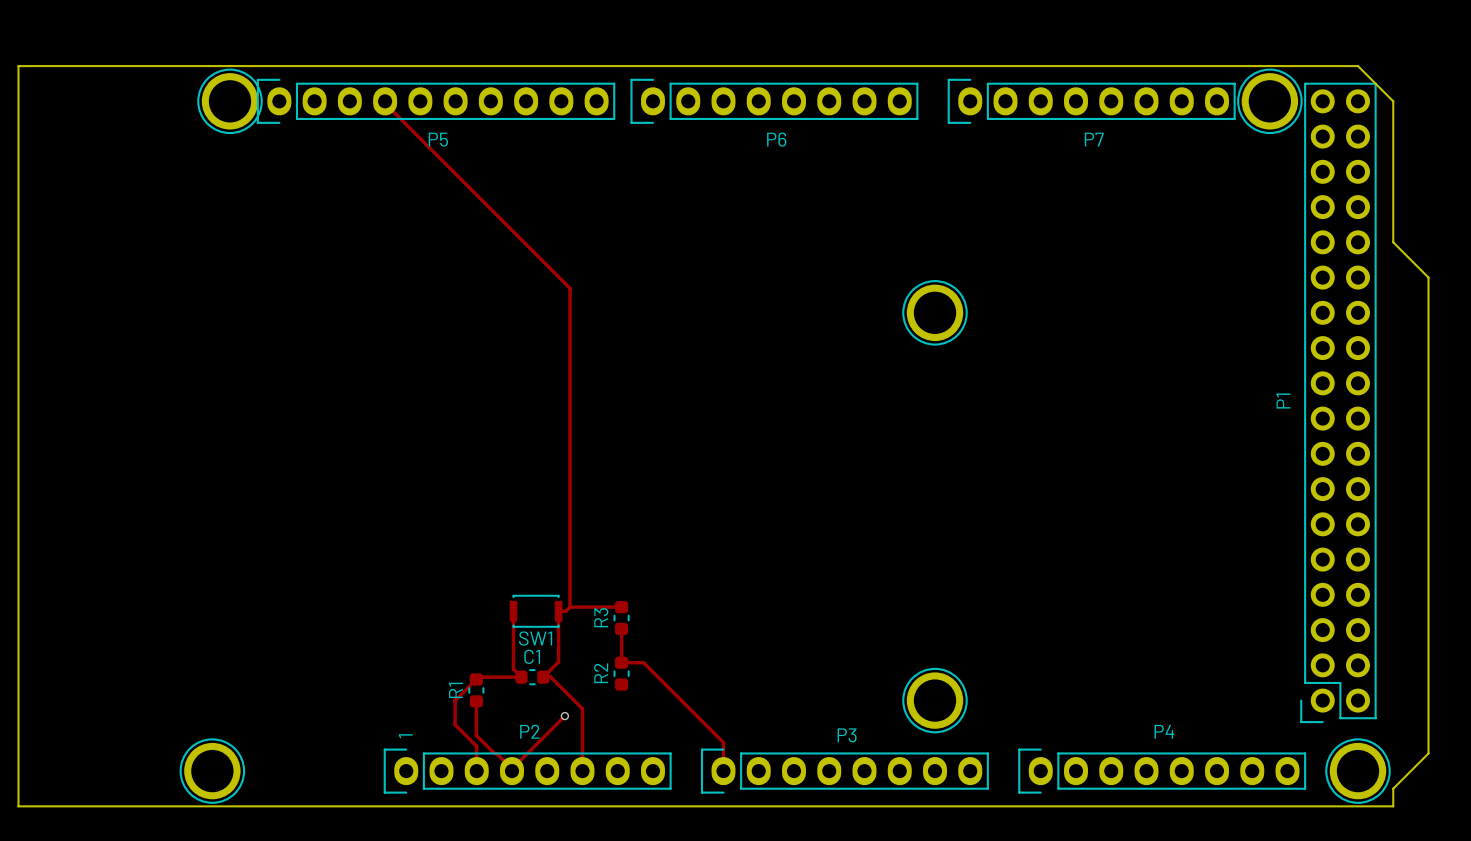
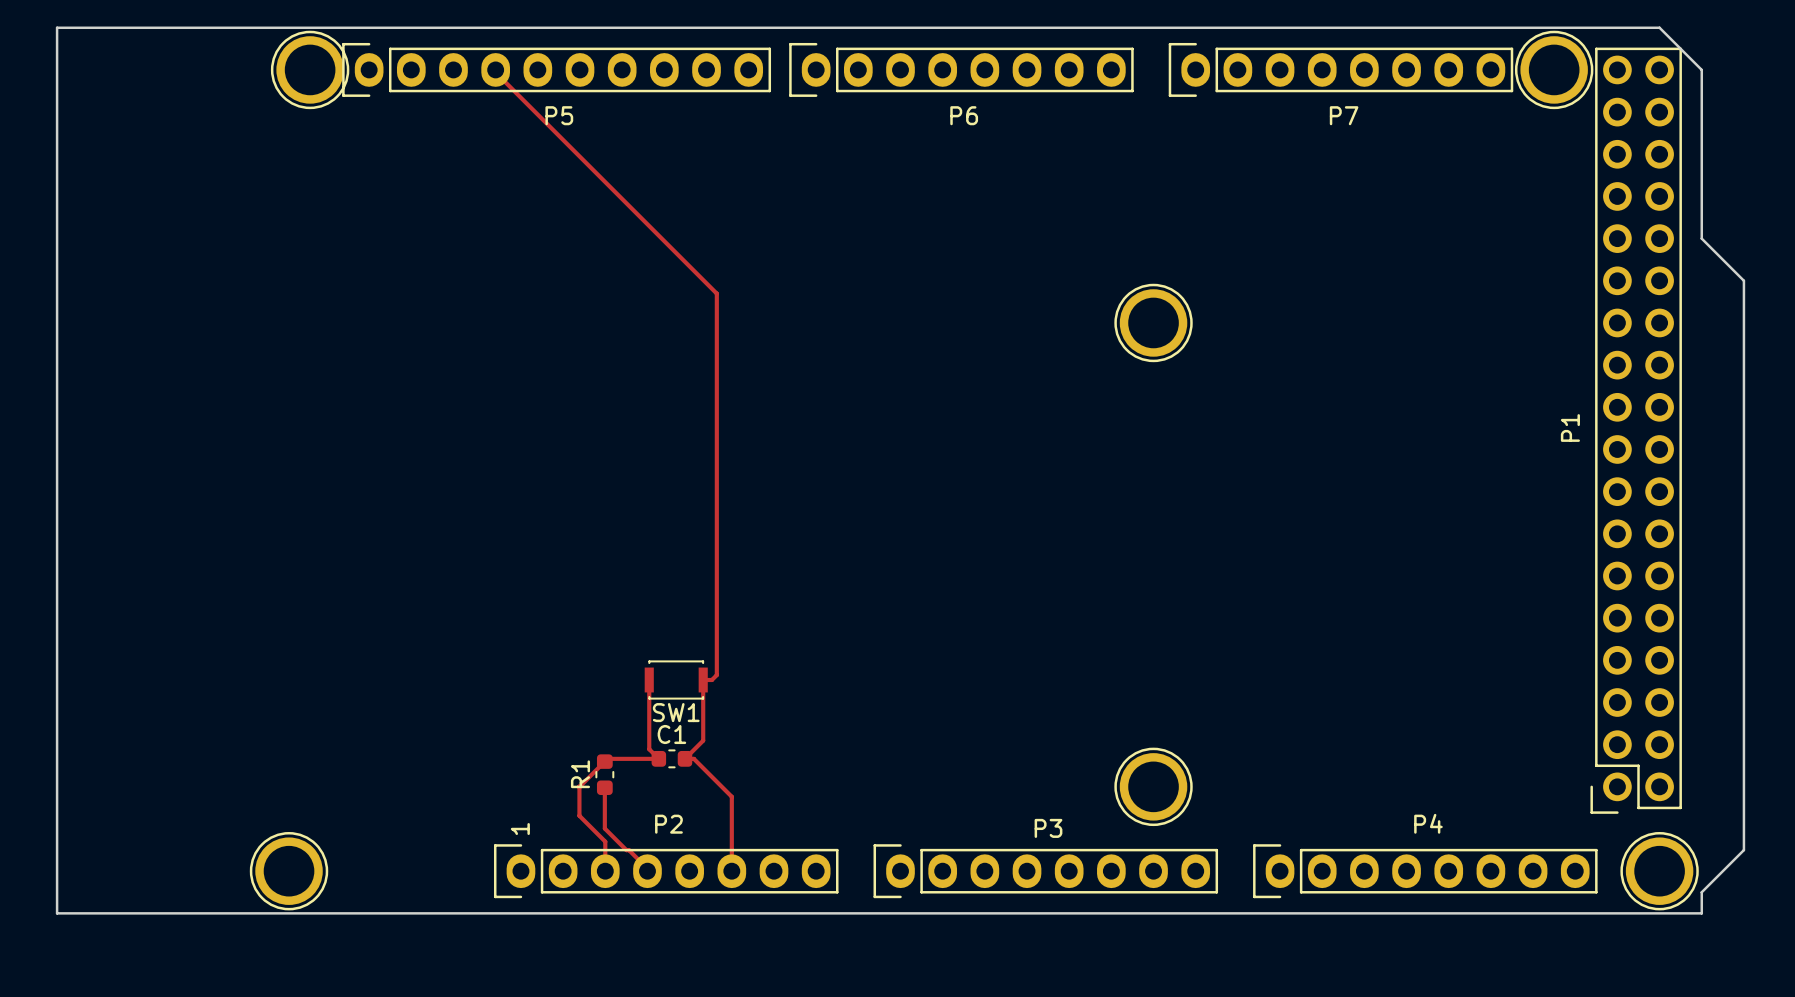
track: (570, 607) (621, 607) -> none
R3: (621, 618) -> none
track: (621, 628) (621, 662) (643, 662) (723, 742) (723, 771) -> none
R2: (621, 673) -> none
track: (564, 716) (512, 768) -> none
via: (564, 716) -> none

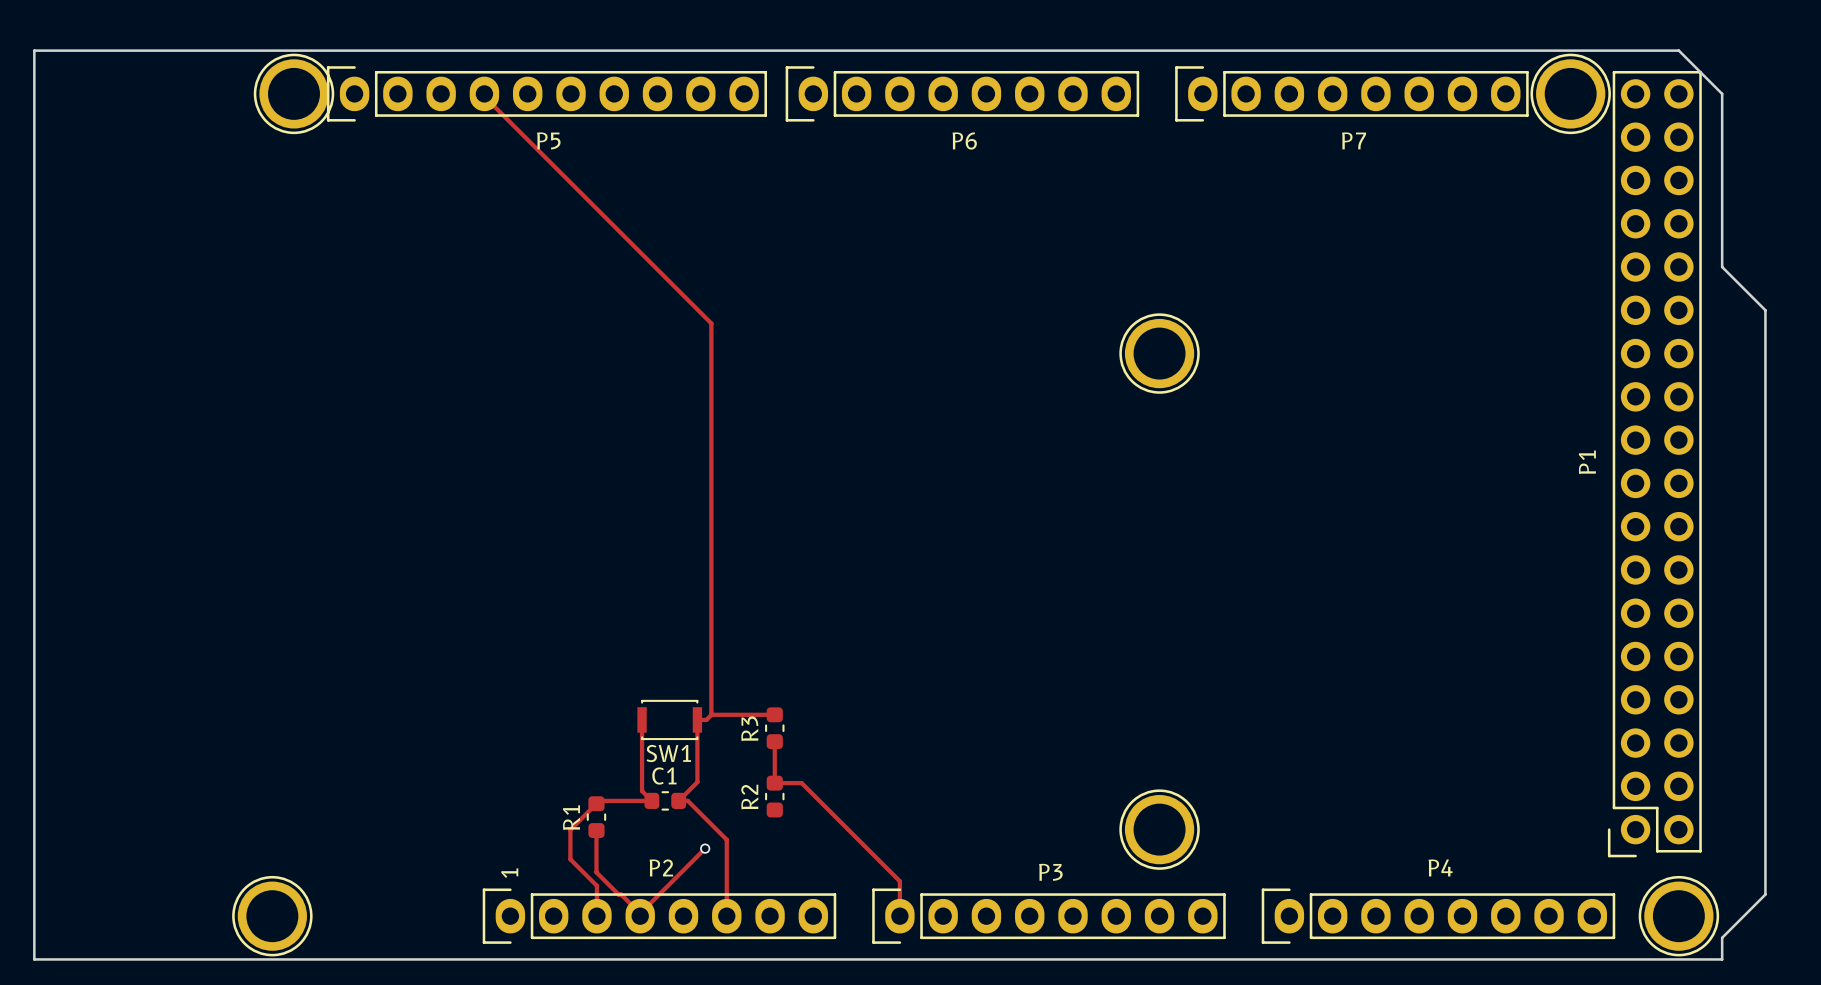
track: none -> (711, 714) (774, 714)
R3: none -> (774, 728)
track: none -> (774, 741) (774, 783) (801, 783) (899, 881) (899, 916)
R2: none -> (774, 796)
track: none -> (705, 848) (640, 913)
via: none -> (705, 848)

